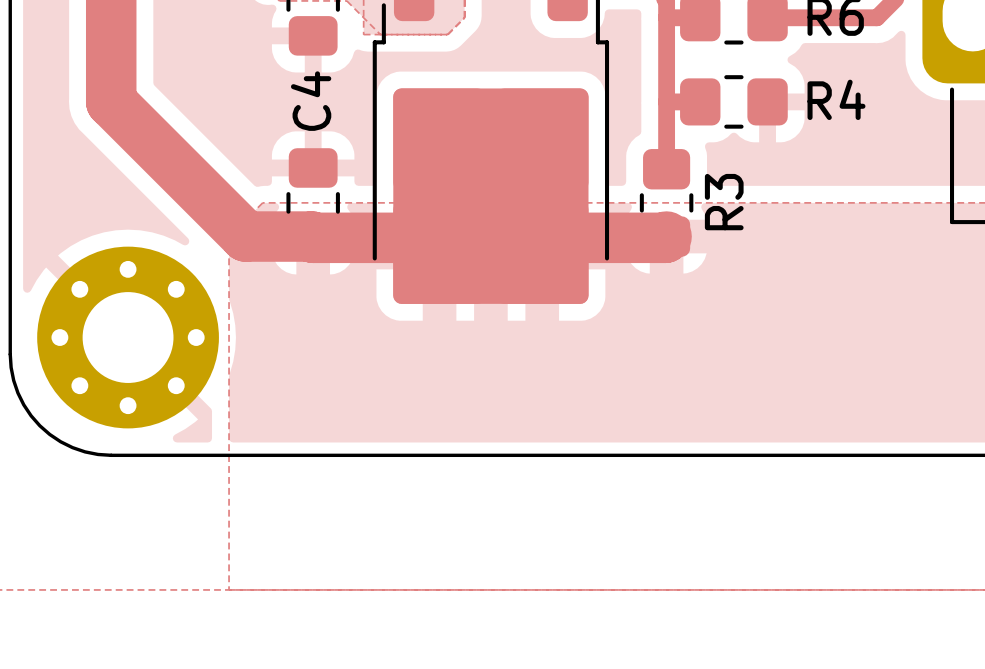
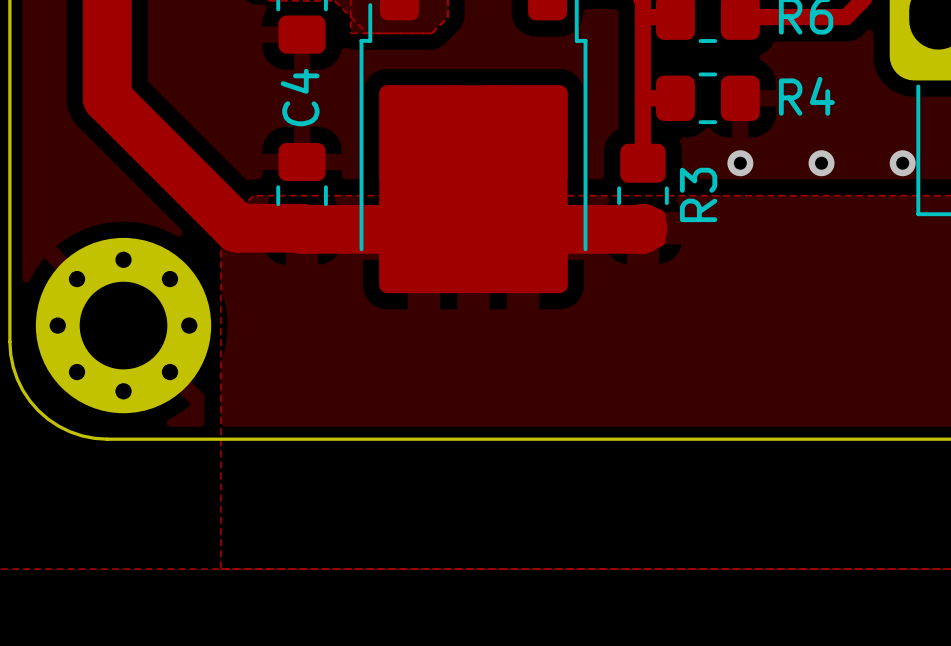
via: none -> (740, 163)
via: none -> (821, 163)
via: none -> (902, 163)

